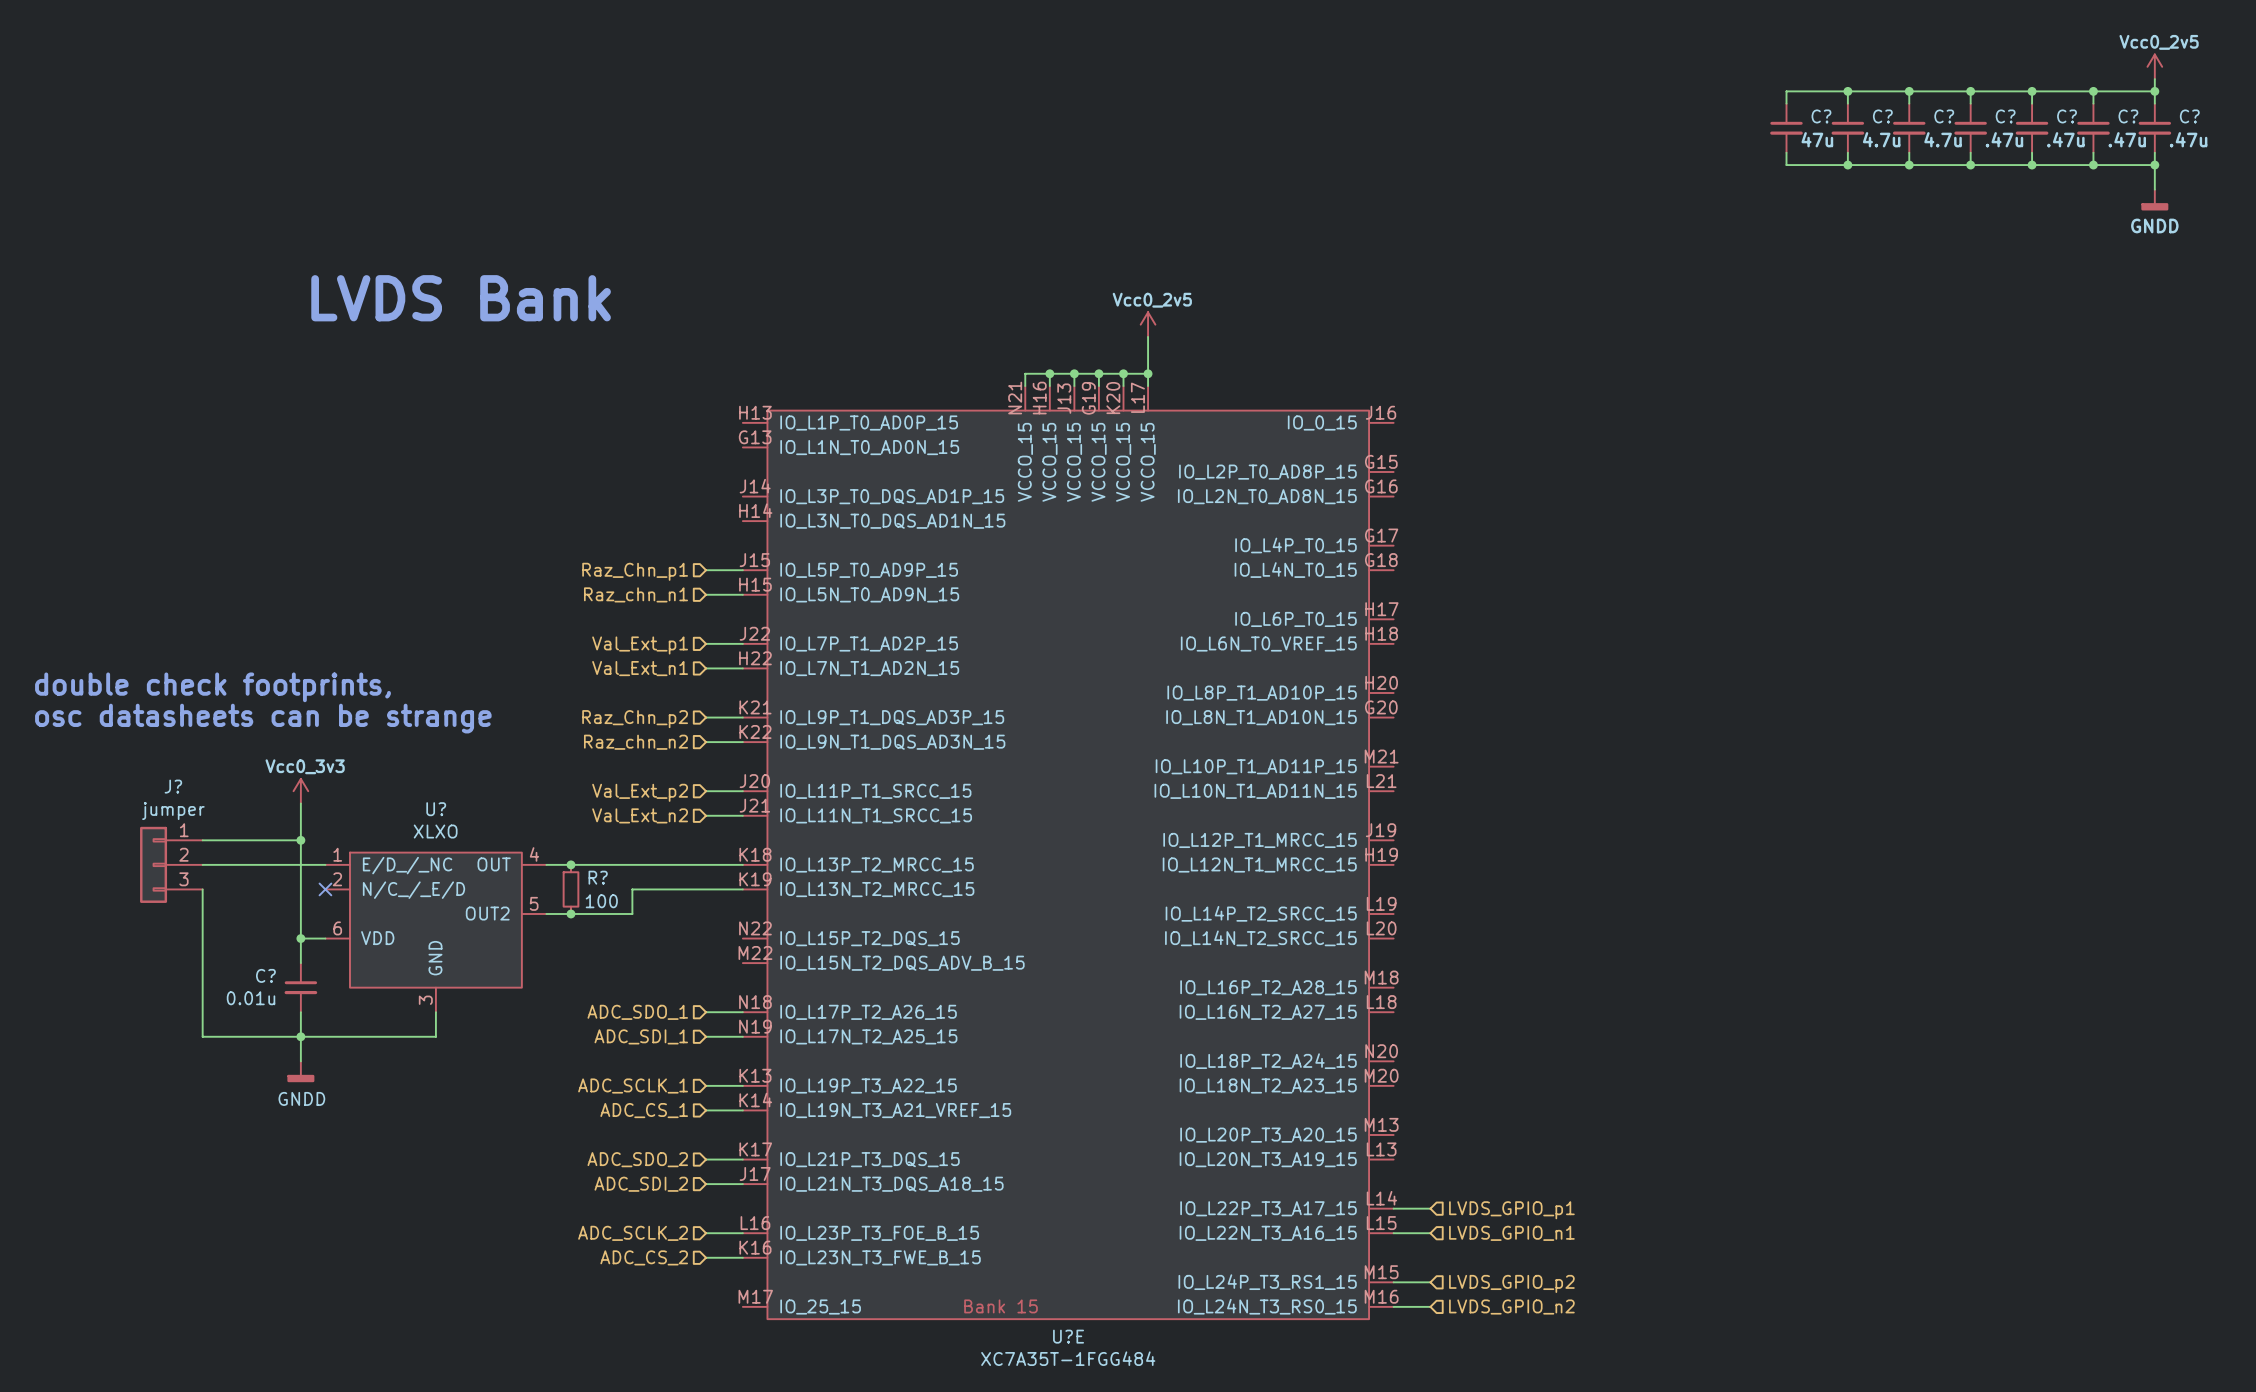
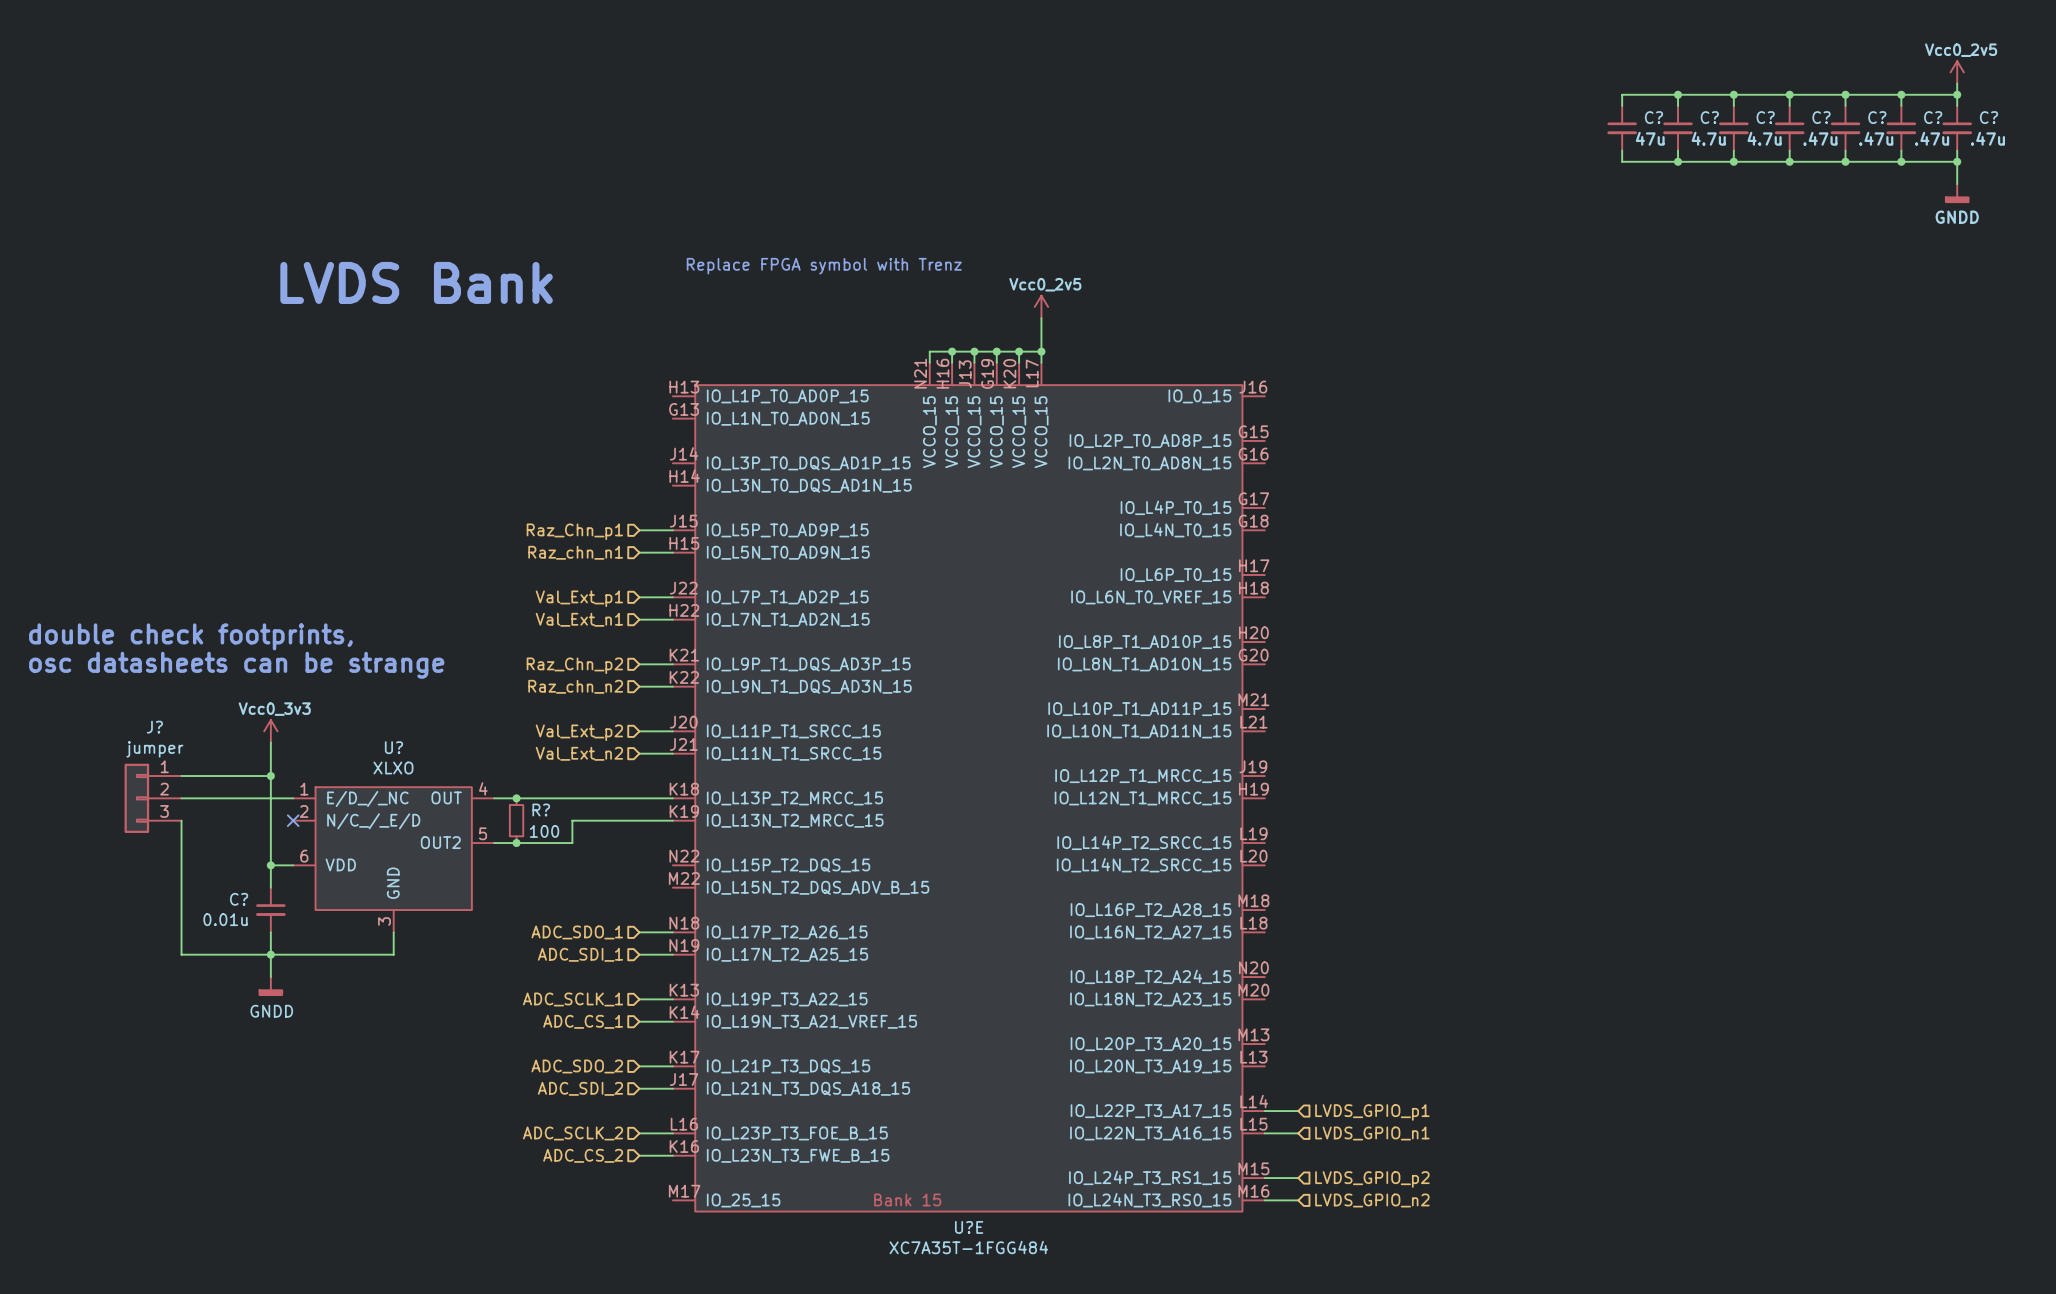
text: none -> Replace FPGA symbol with Trenz (824, 266)

